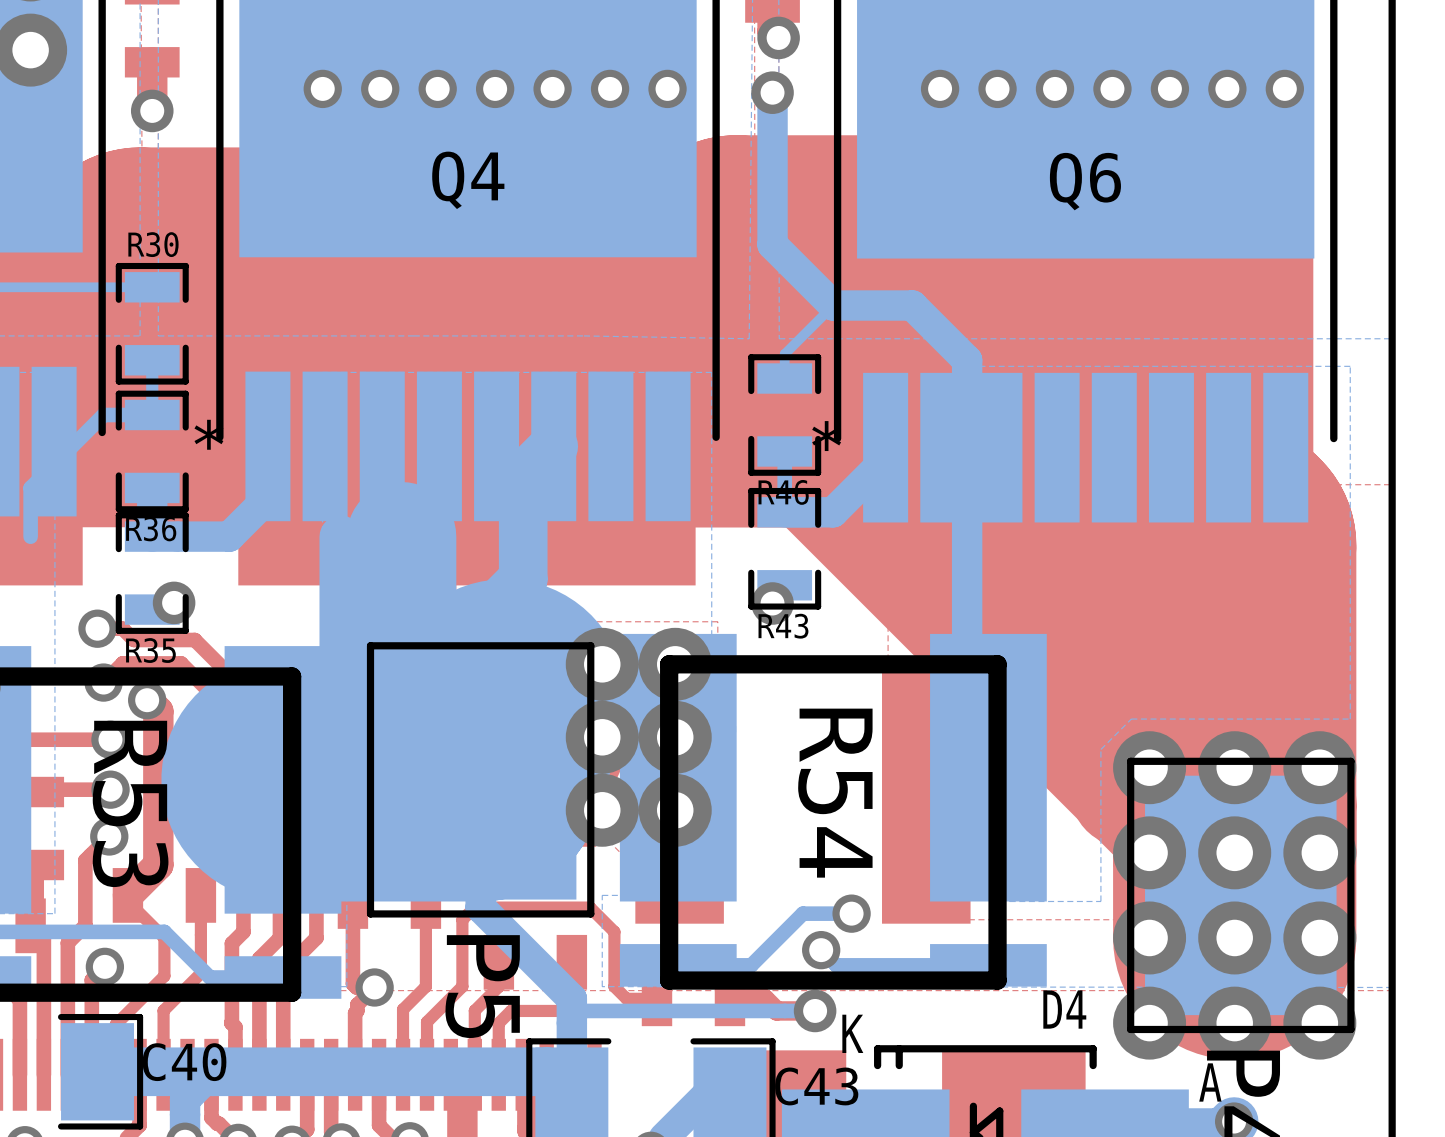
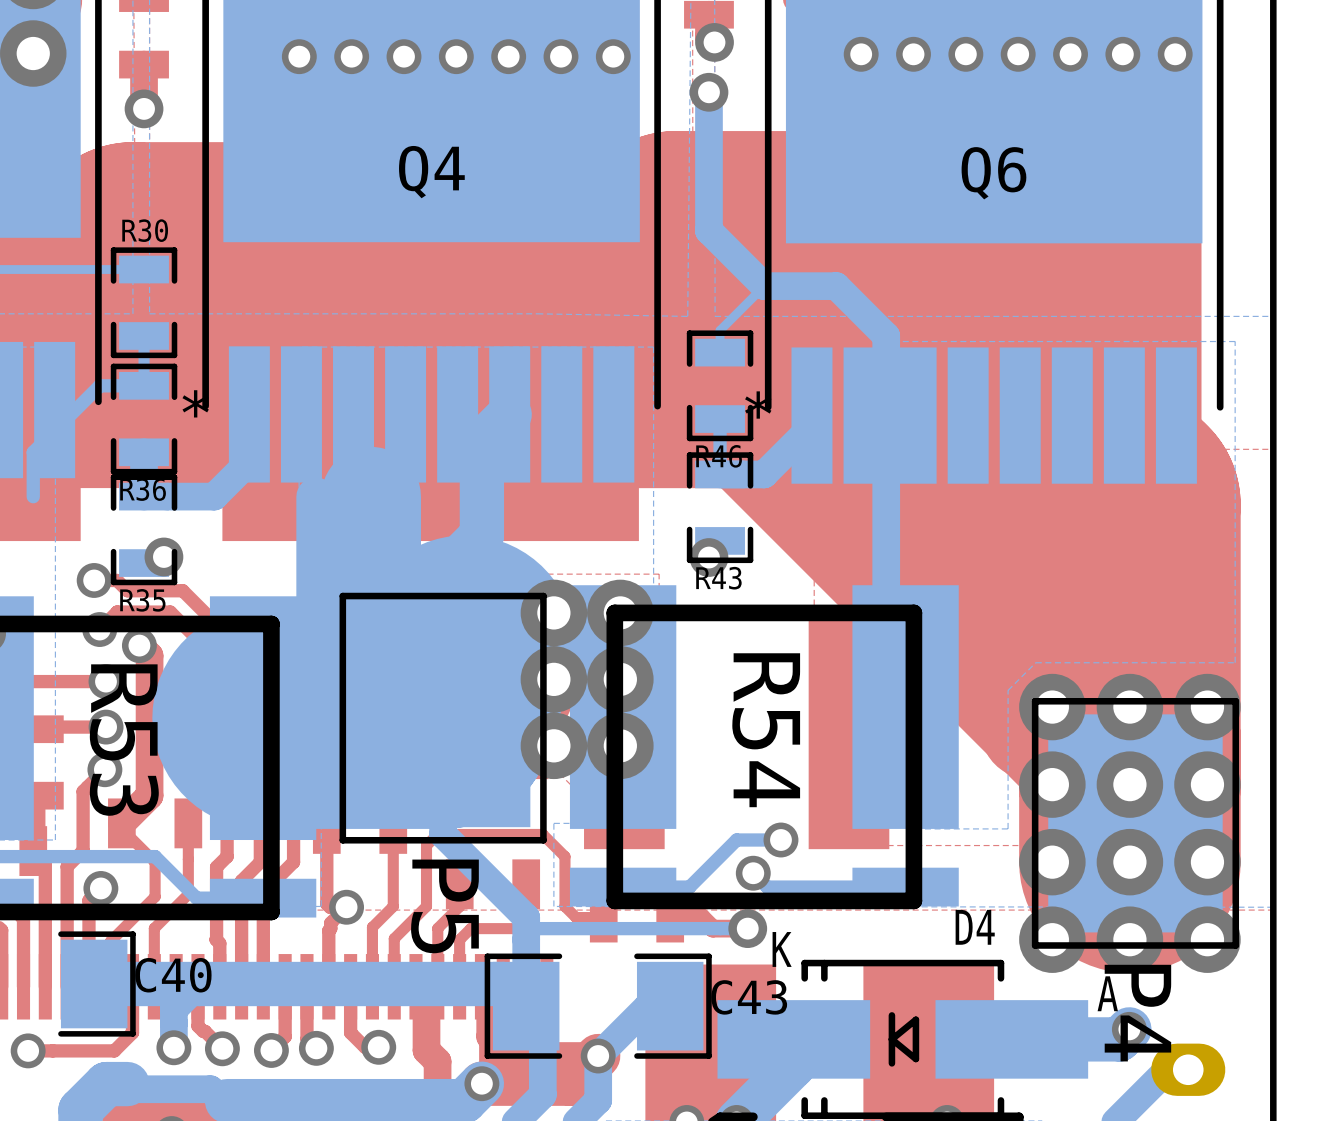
via position: (322, 88) -> (299, 56)
via position: (380, 88) -> (351, 56)
via position: (437, 88) -> (404, 56)
via position: (495, 88) -> (456, 56)
via position: (552, 88) -> (508, 56)
via position: (610, 88) -> (561, 56)
via position: (667, 88) -> (613, 56)
via position: (940, 88) -> (861, 54)
via position: (997, 88) -> (913, 54)
via position: (1054, 88) -> (965, 54)
via position: (1112, 88) -> (1018, 54)
via position: (1169, 88) -> (1070, 54)
via position: (1227, 88) -> (1122, 54)
via position: (1284, 88) -> (1175, 54)

